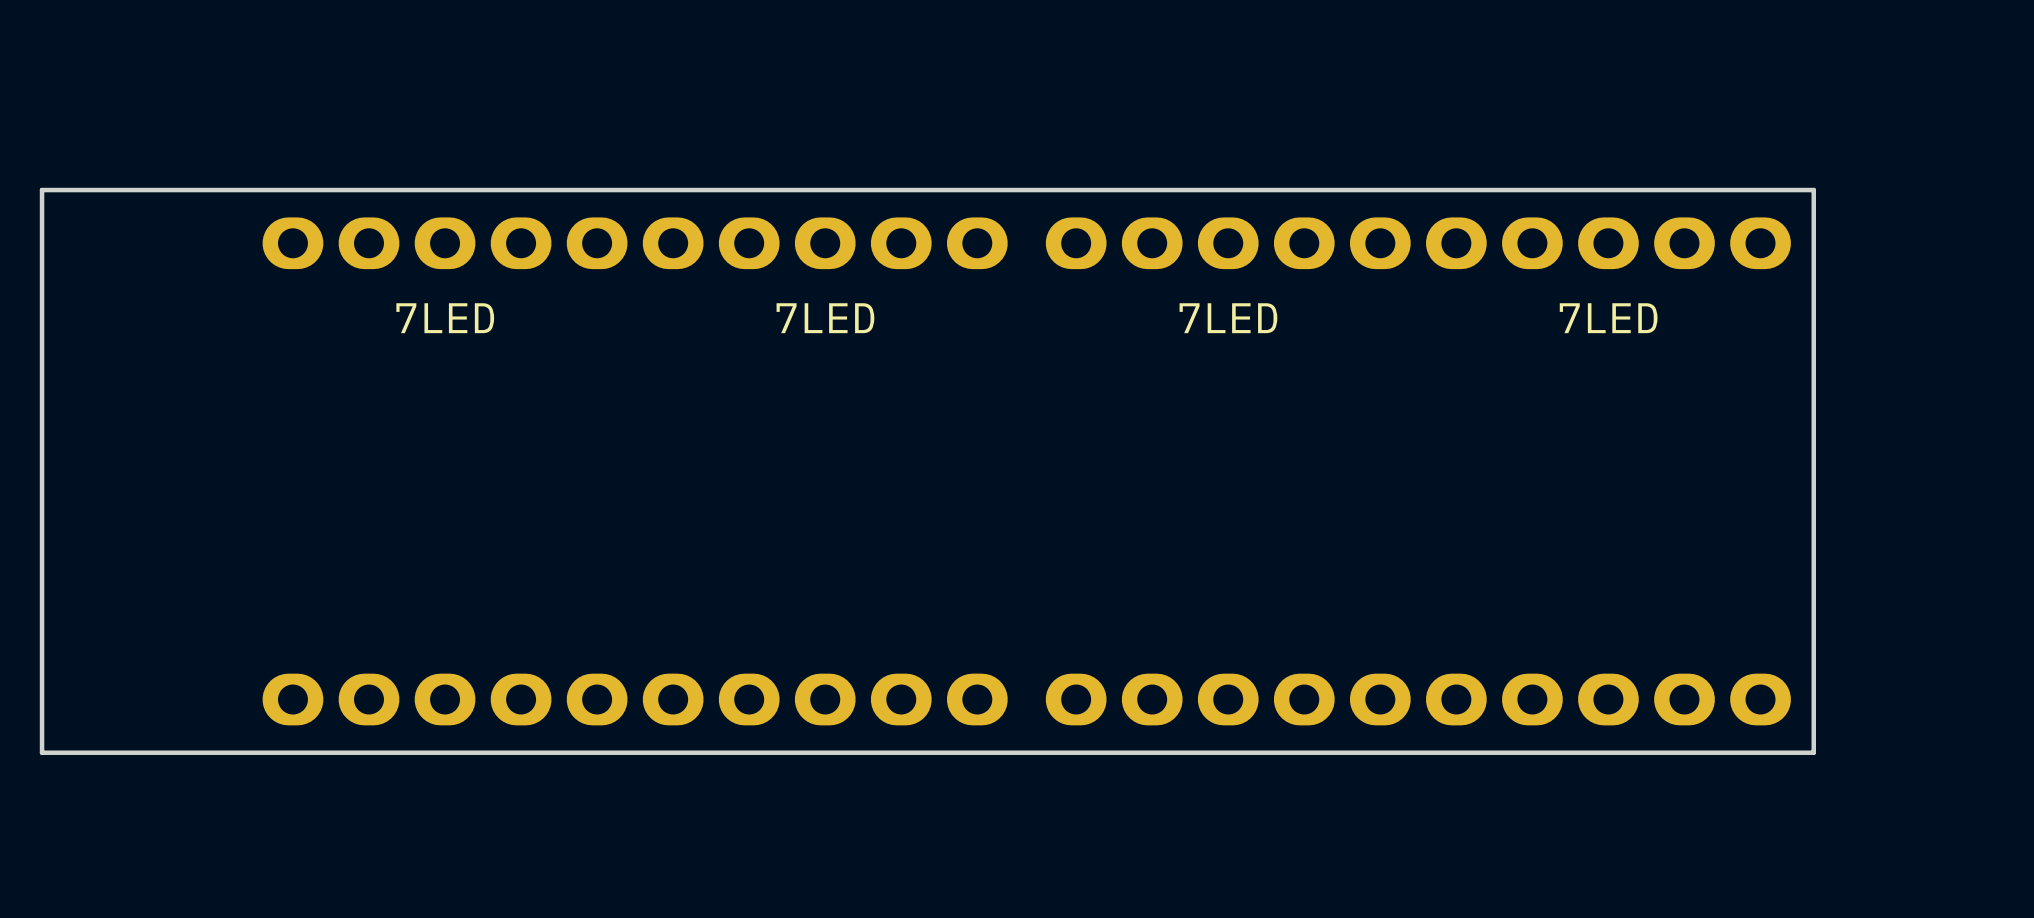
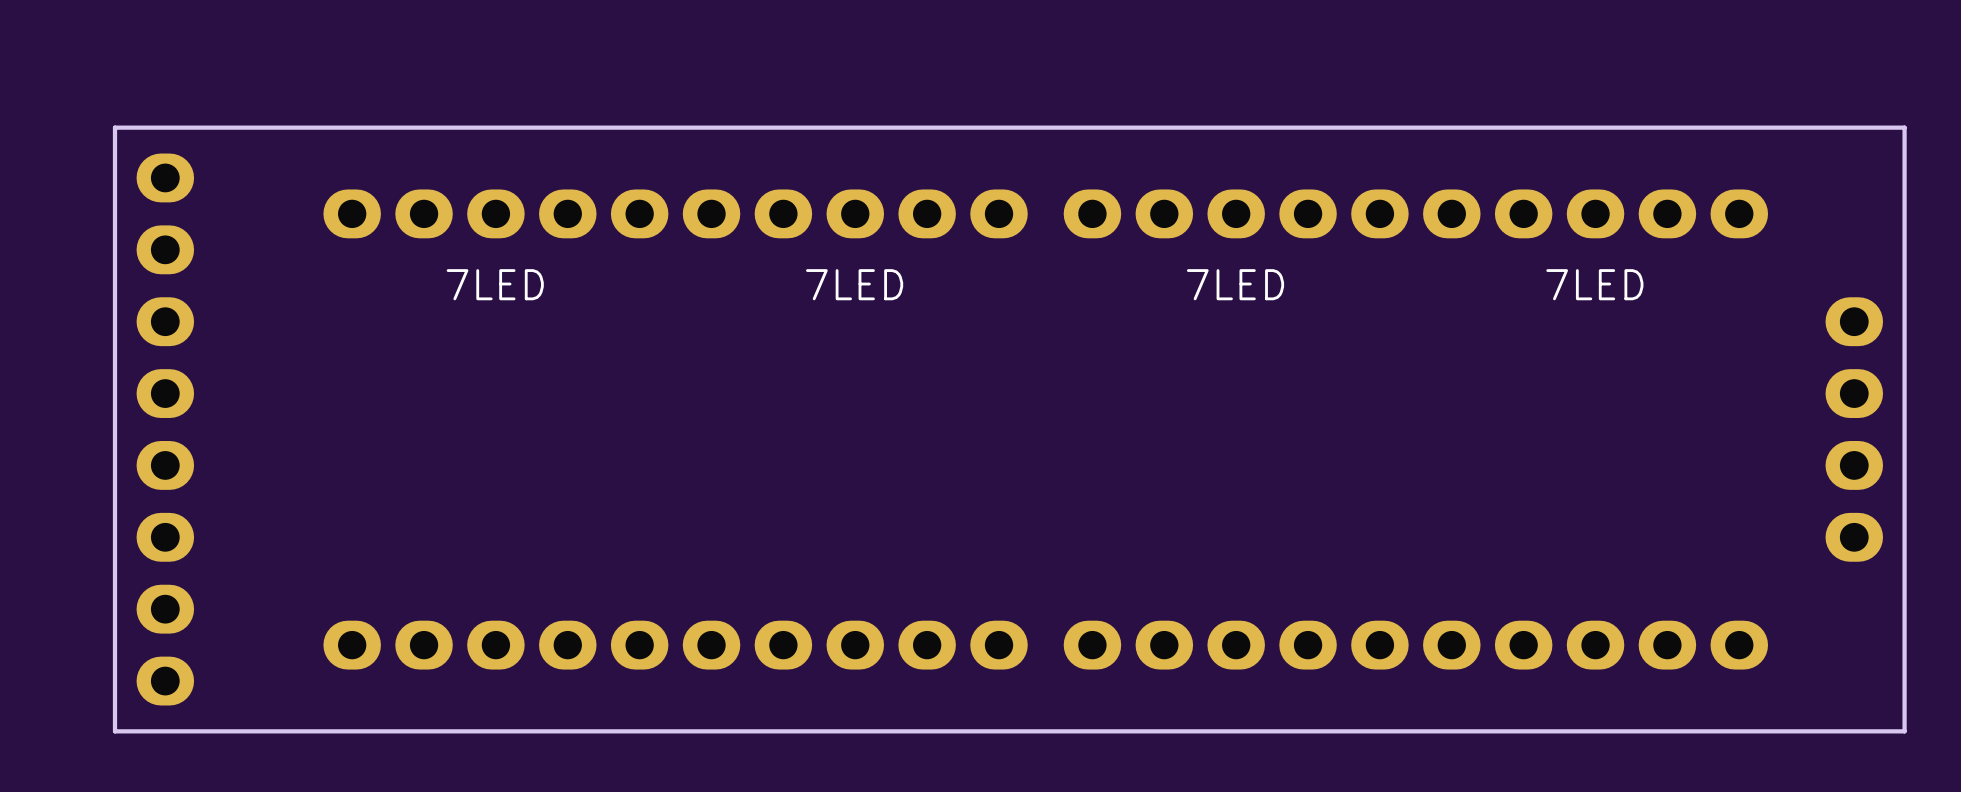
board edge: (42, 190) (1813, 190) (1813, 752) (42, 752) -> (115, 163) (115, 127) (1904, 127) (1904, 731) (115, 731) (115, 695)
part: none -> (165, 429)
part: none -> (1854, 429)

